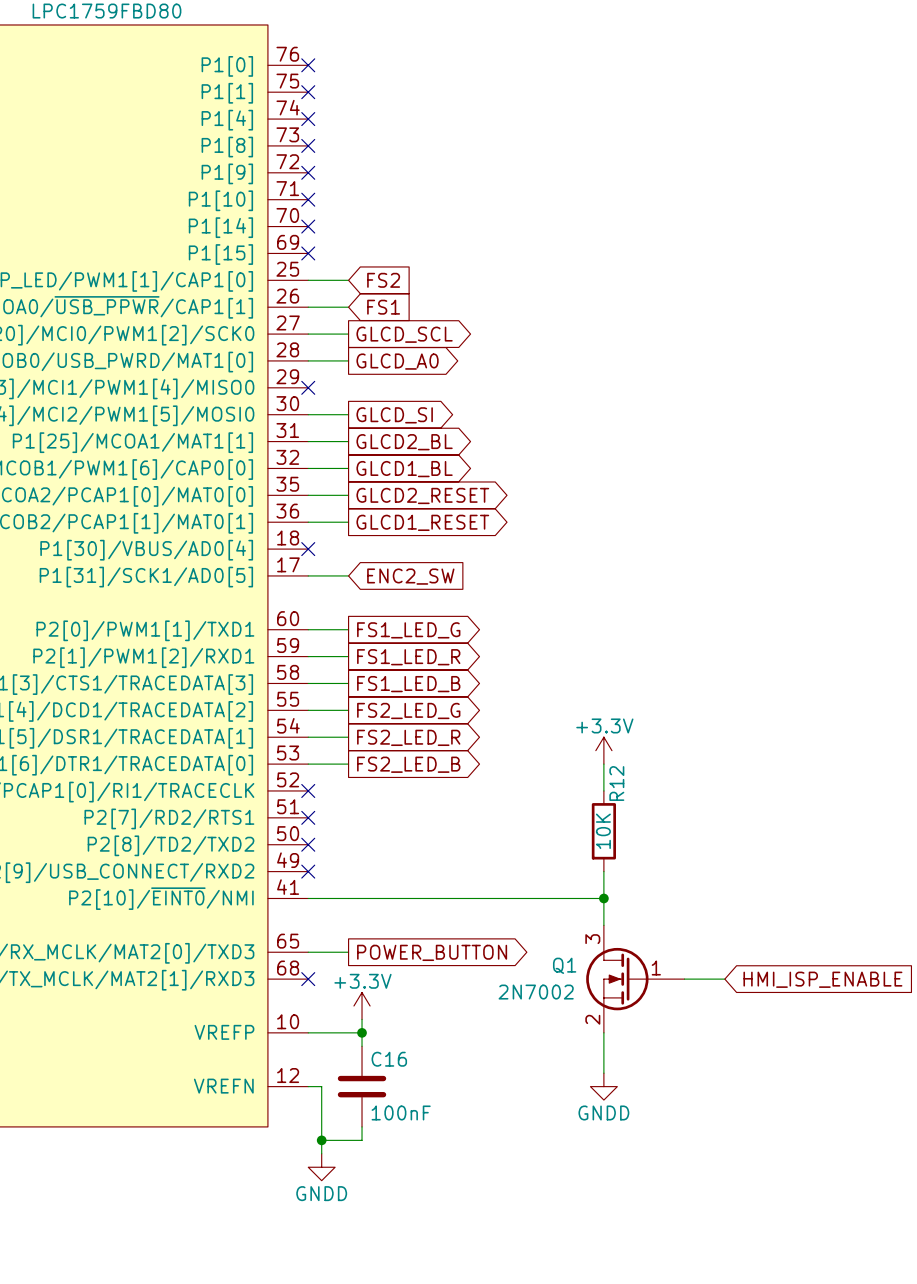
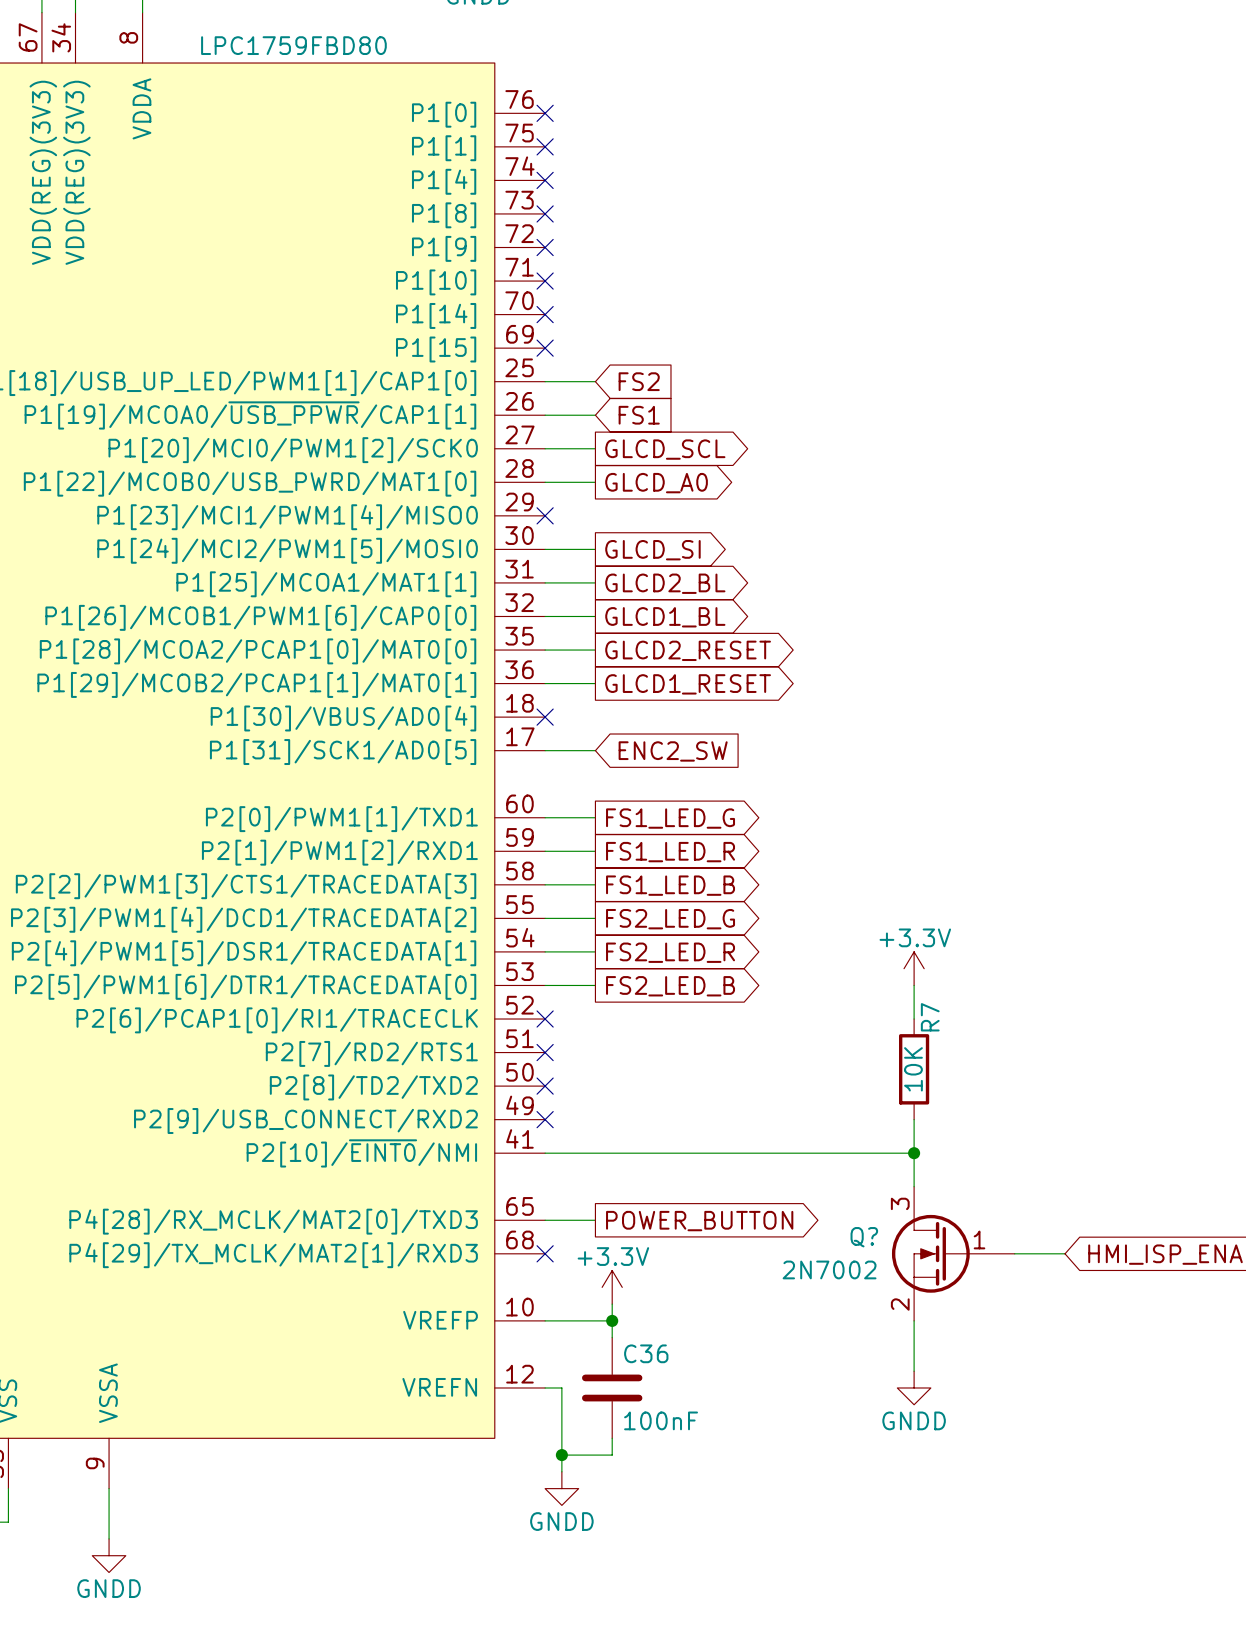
R12 name: R12 (616, 783) -> R7 (930, 1017)
Q1 name: Q1 (564, 965) -> Q? (864, 1237)
C16 name: C16 (389, 1059) -> C36 (646, 1353)

